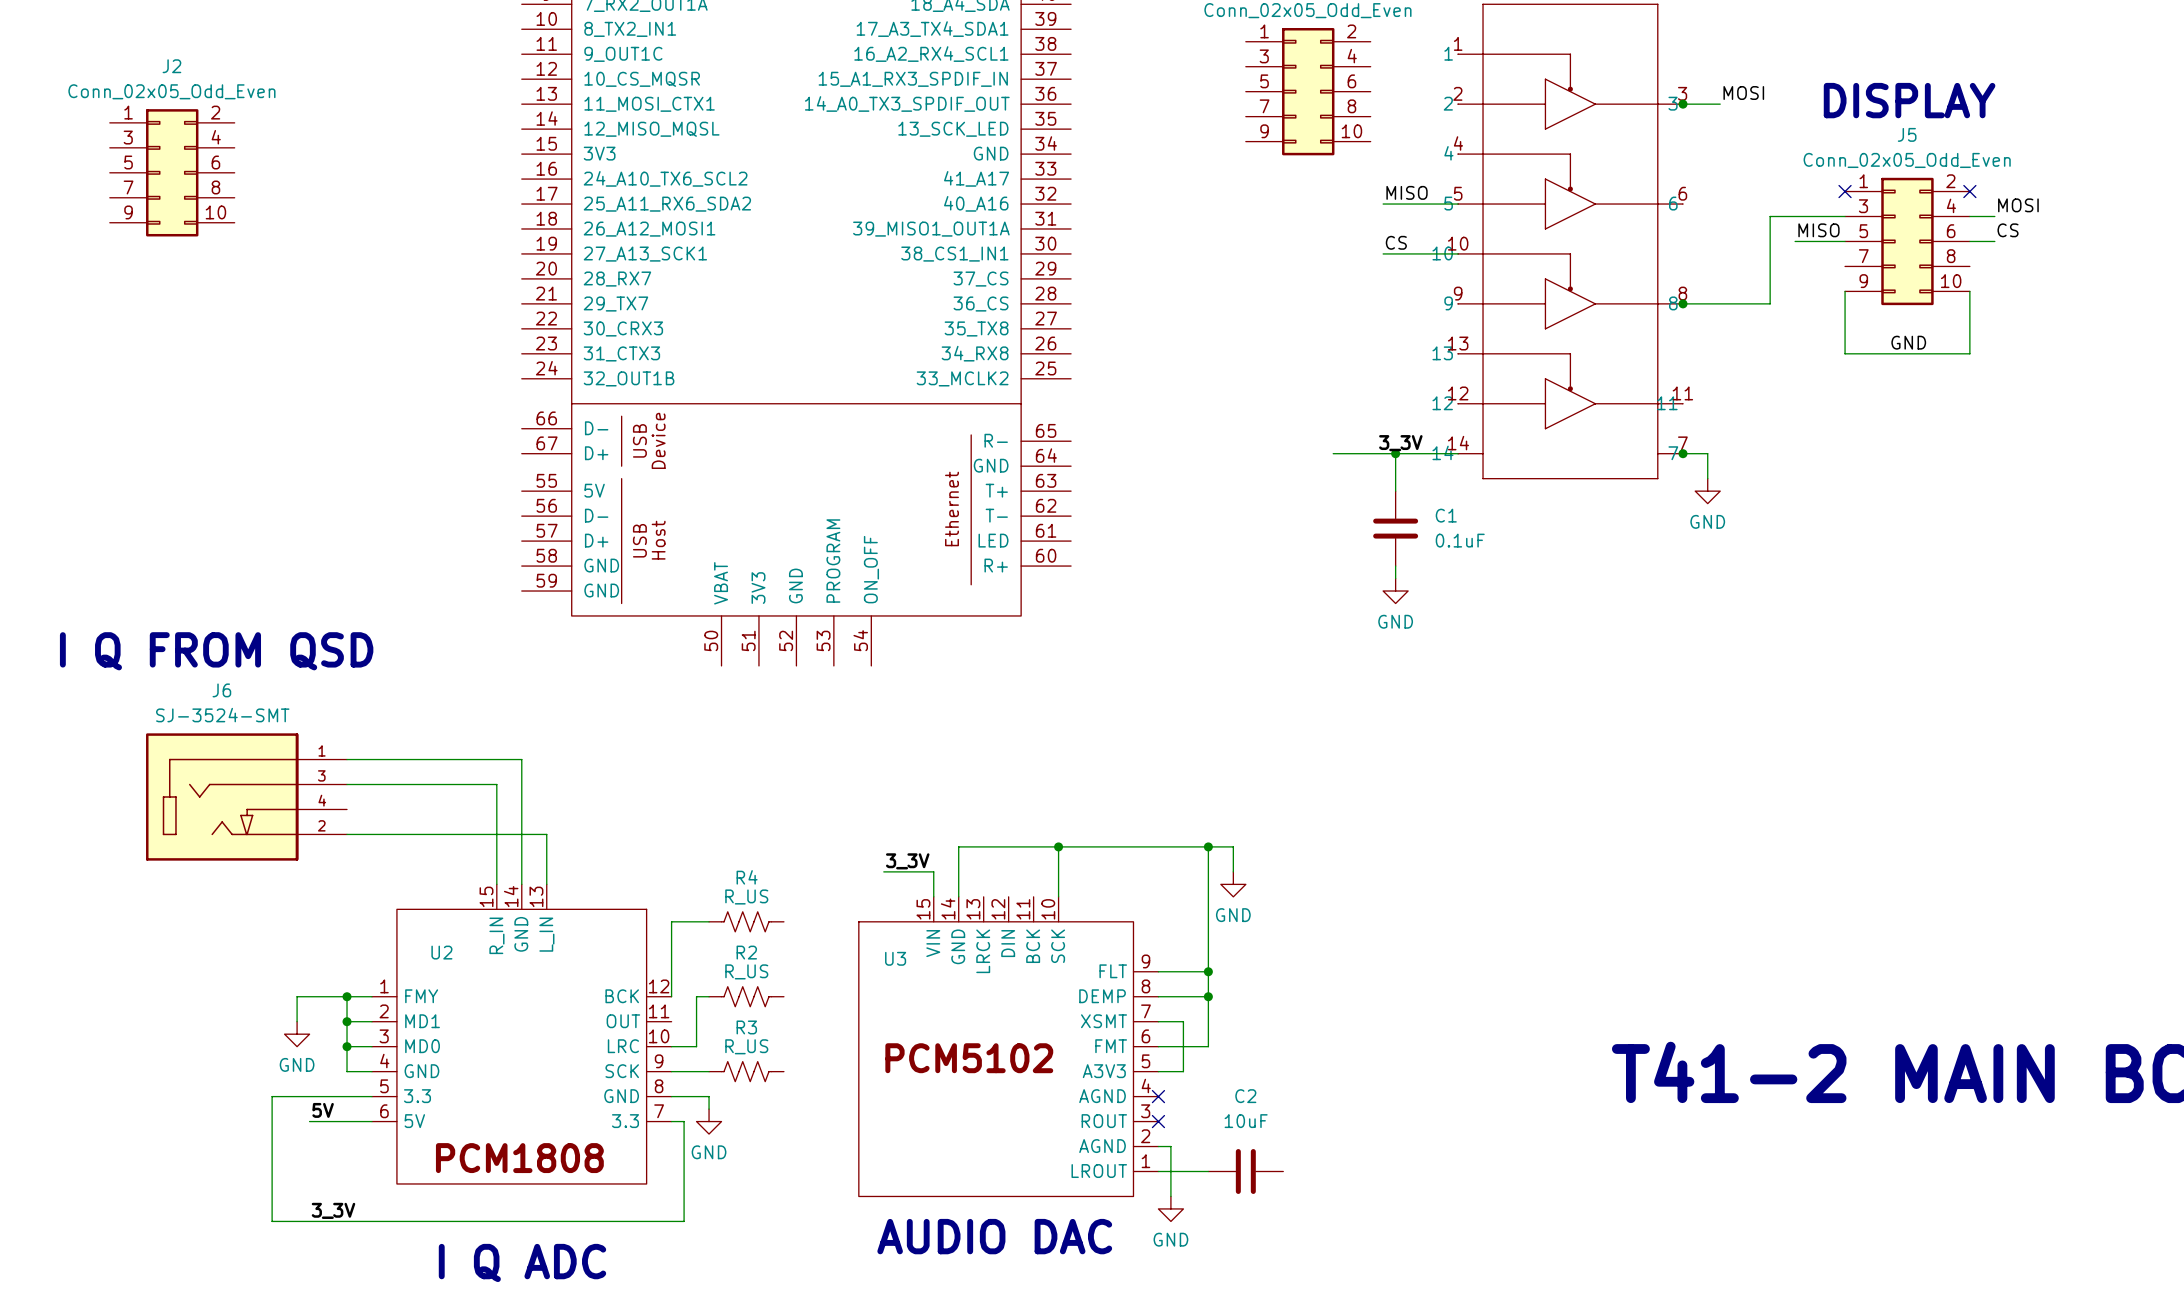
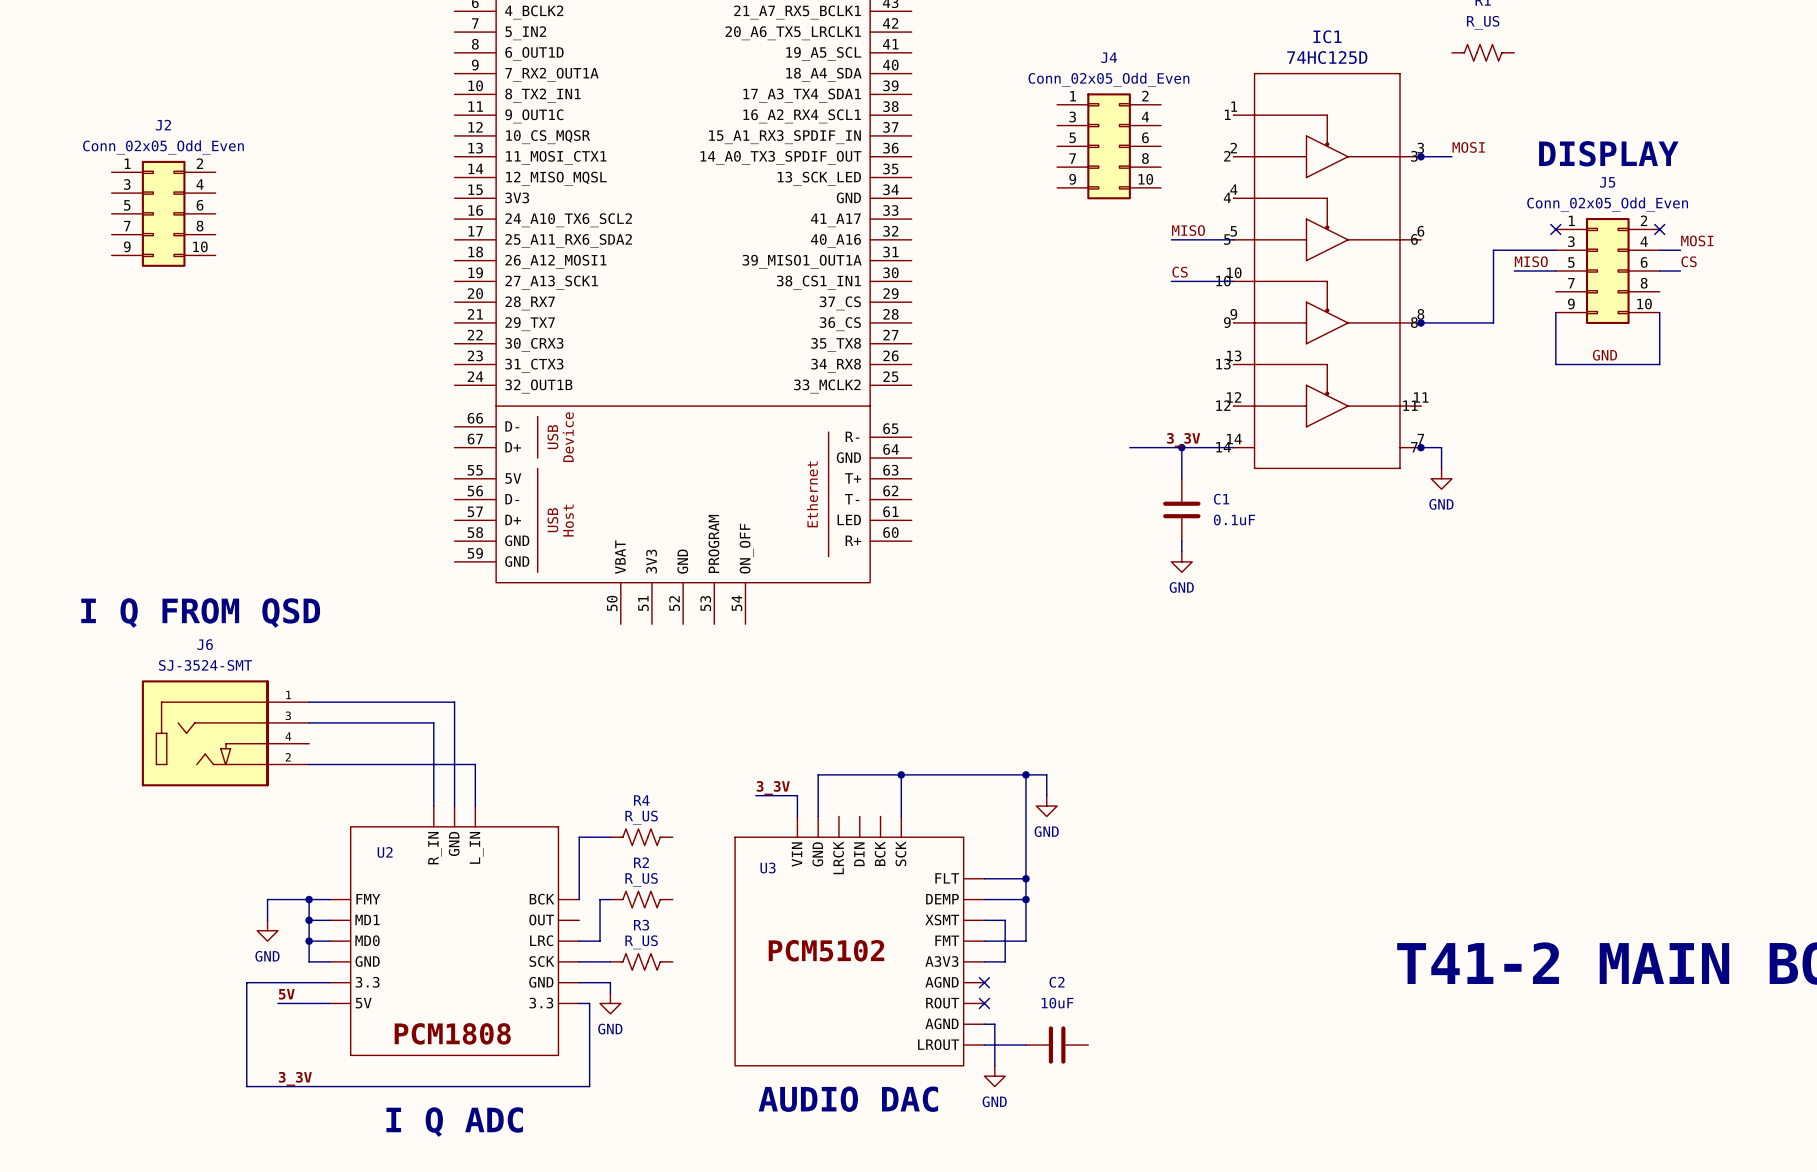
U2 symbol: [371, 884, 672, 1184] -> [329, 806, 580, 1056]
U3 symbol: [858, 896, 1159, 1197] -> [735, 816, 985, 1066]

